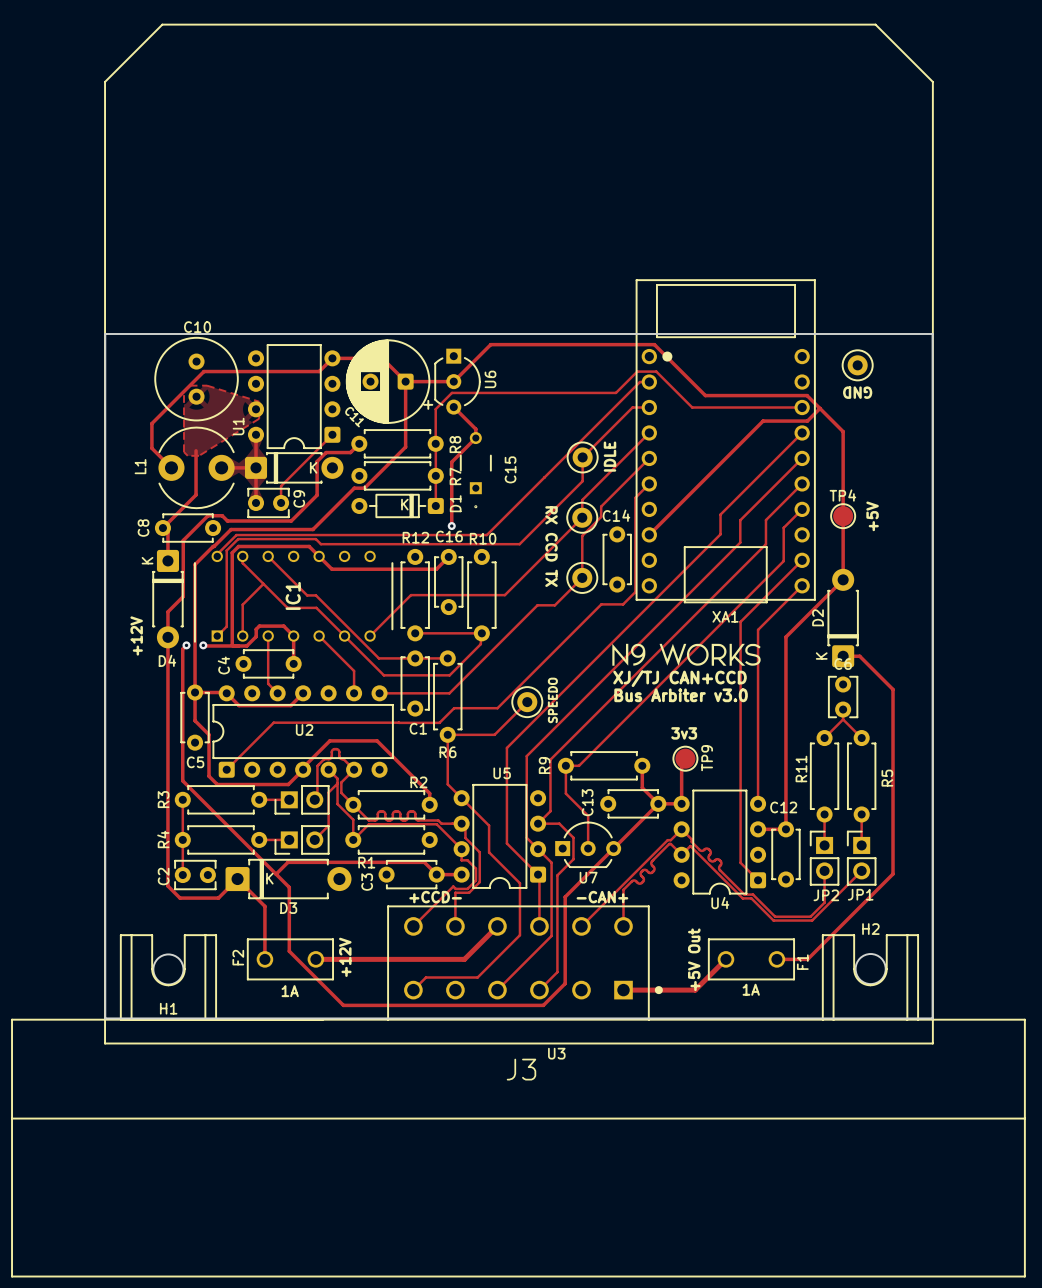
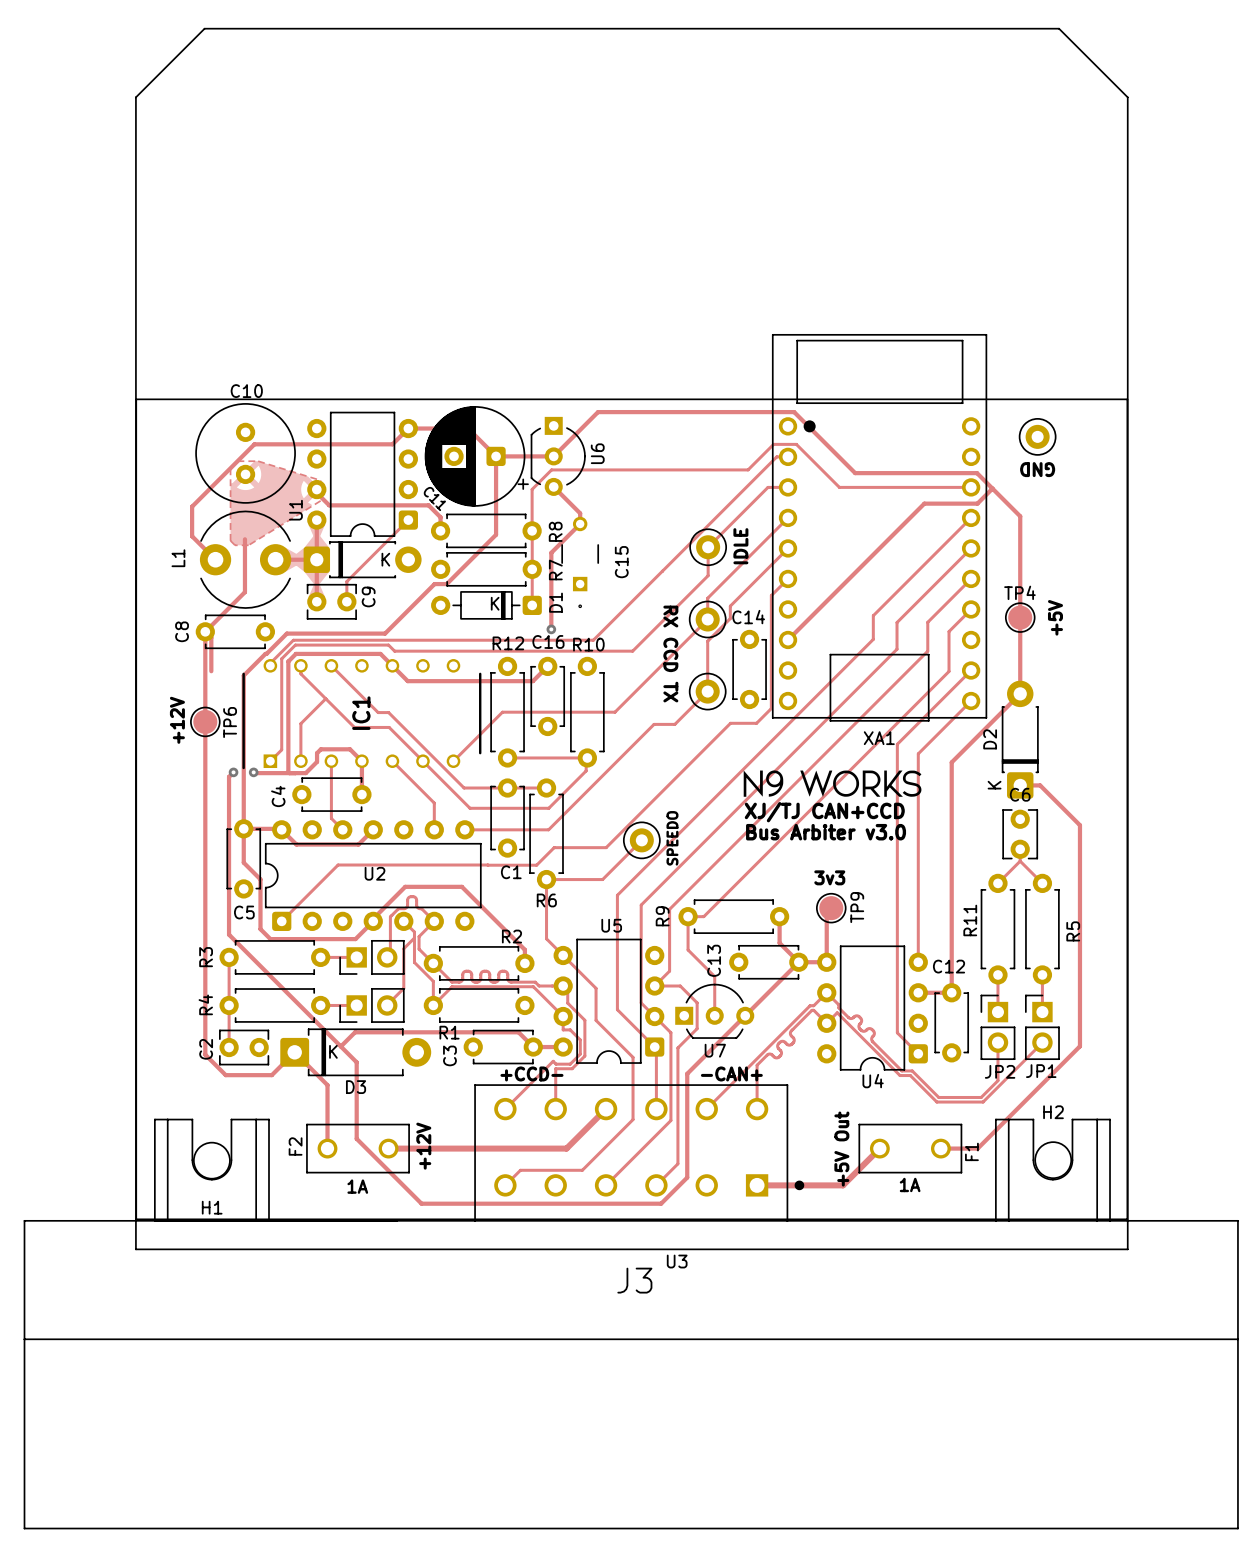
track: none -> (313, 489) (329, 505) (428, 505) (440, 517) (440, 530)
track: (359, 443) (350, 452) (326, 452) (317, 461) (317, 495) (291, 521) (227, 521) (222, 515) (207, 515) (183, 540) (183, 596) (167, 611) (167, 886) -> (205, 631) (205, 1054) (211, 1060)
D4: (167, 599) -> none
TP6: none -> (205, 721)
text position: +12V (136, 635) -> +12V (177, 720)

